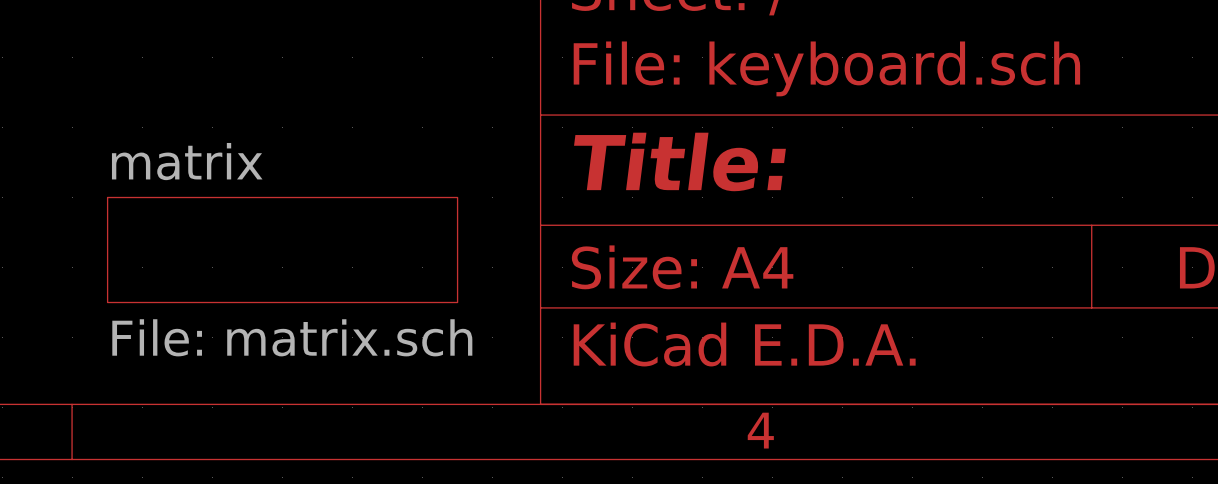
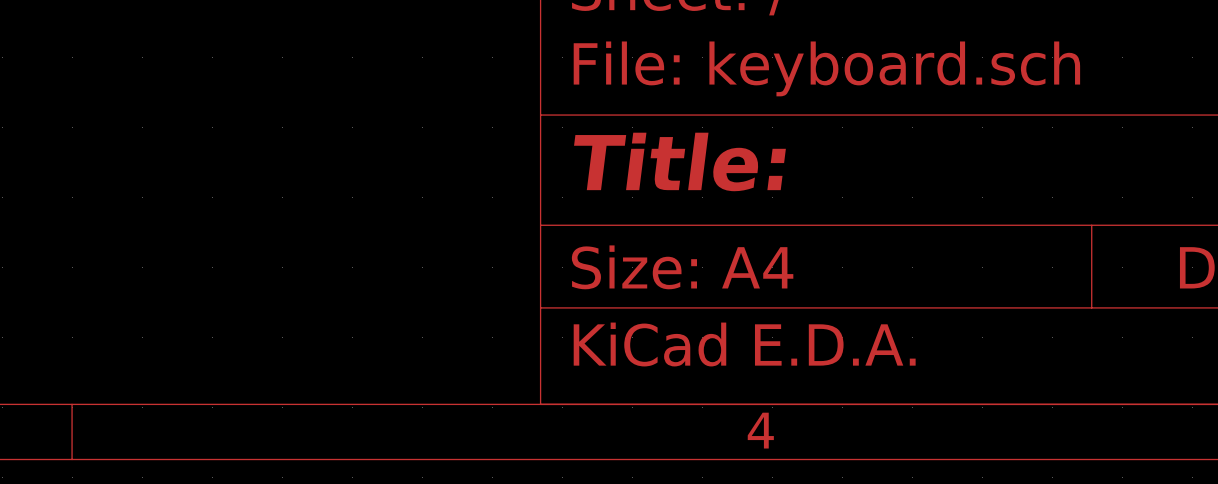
sheet matrix: File: matrix.sch (282, 250) -> none

